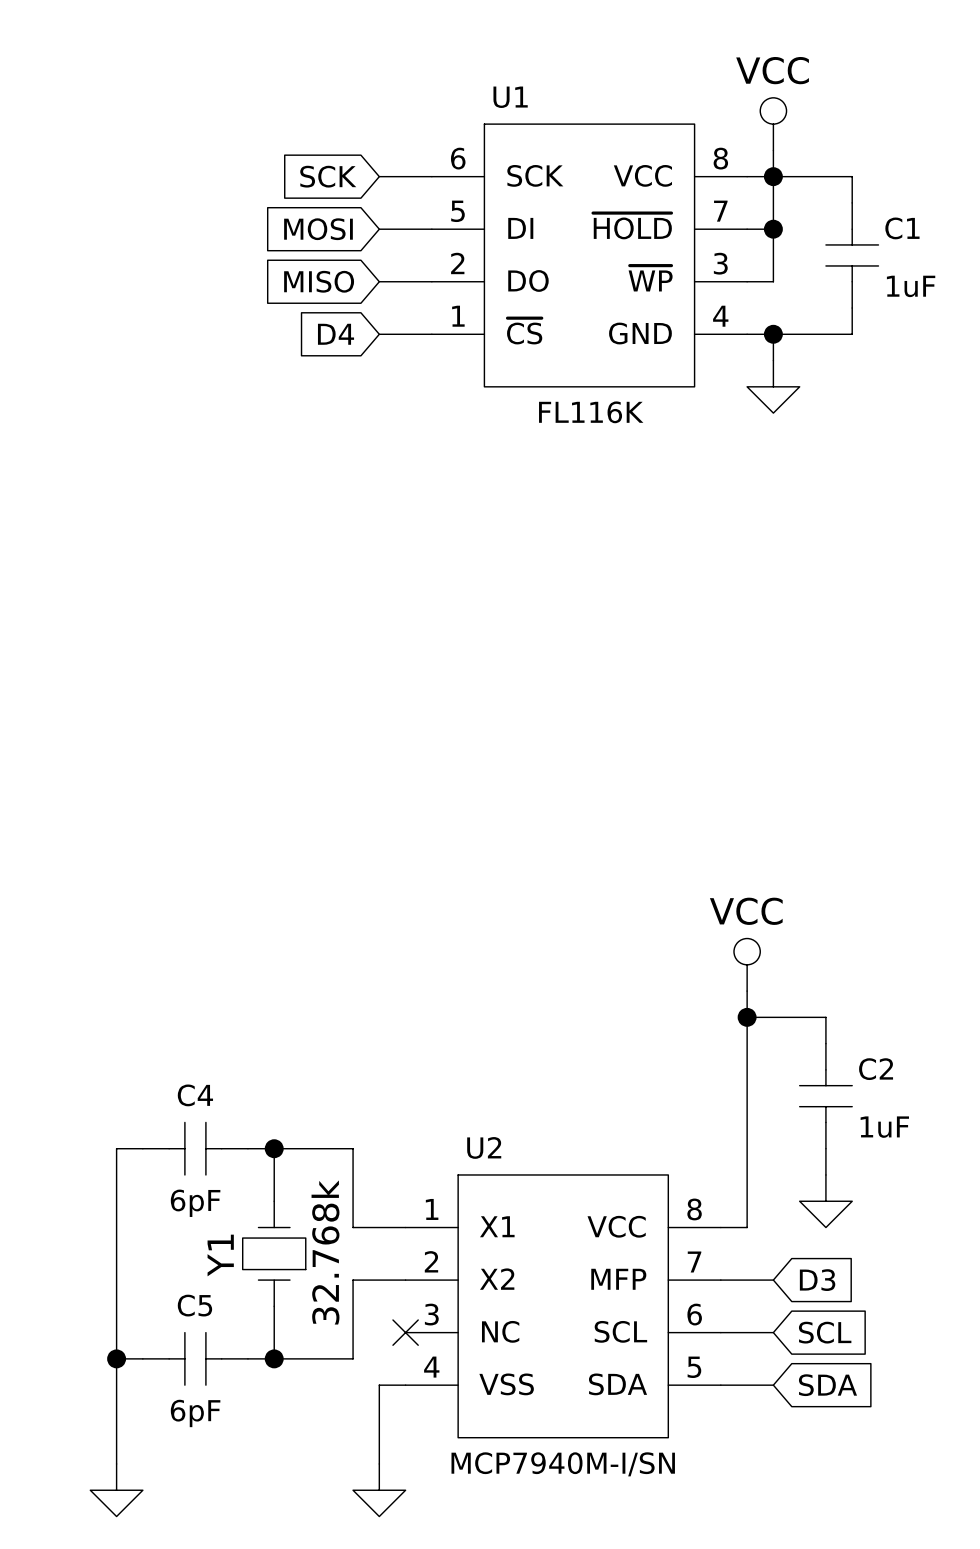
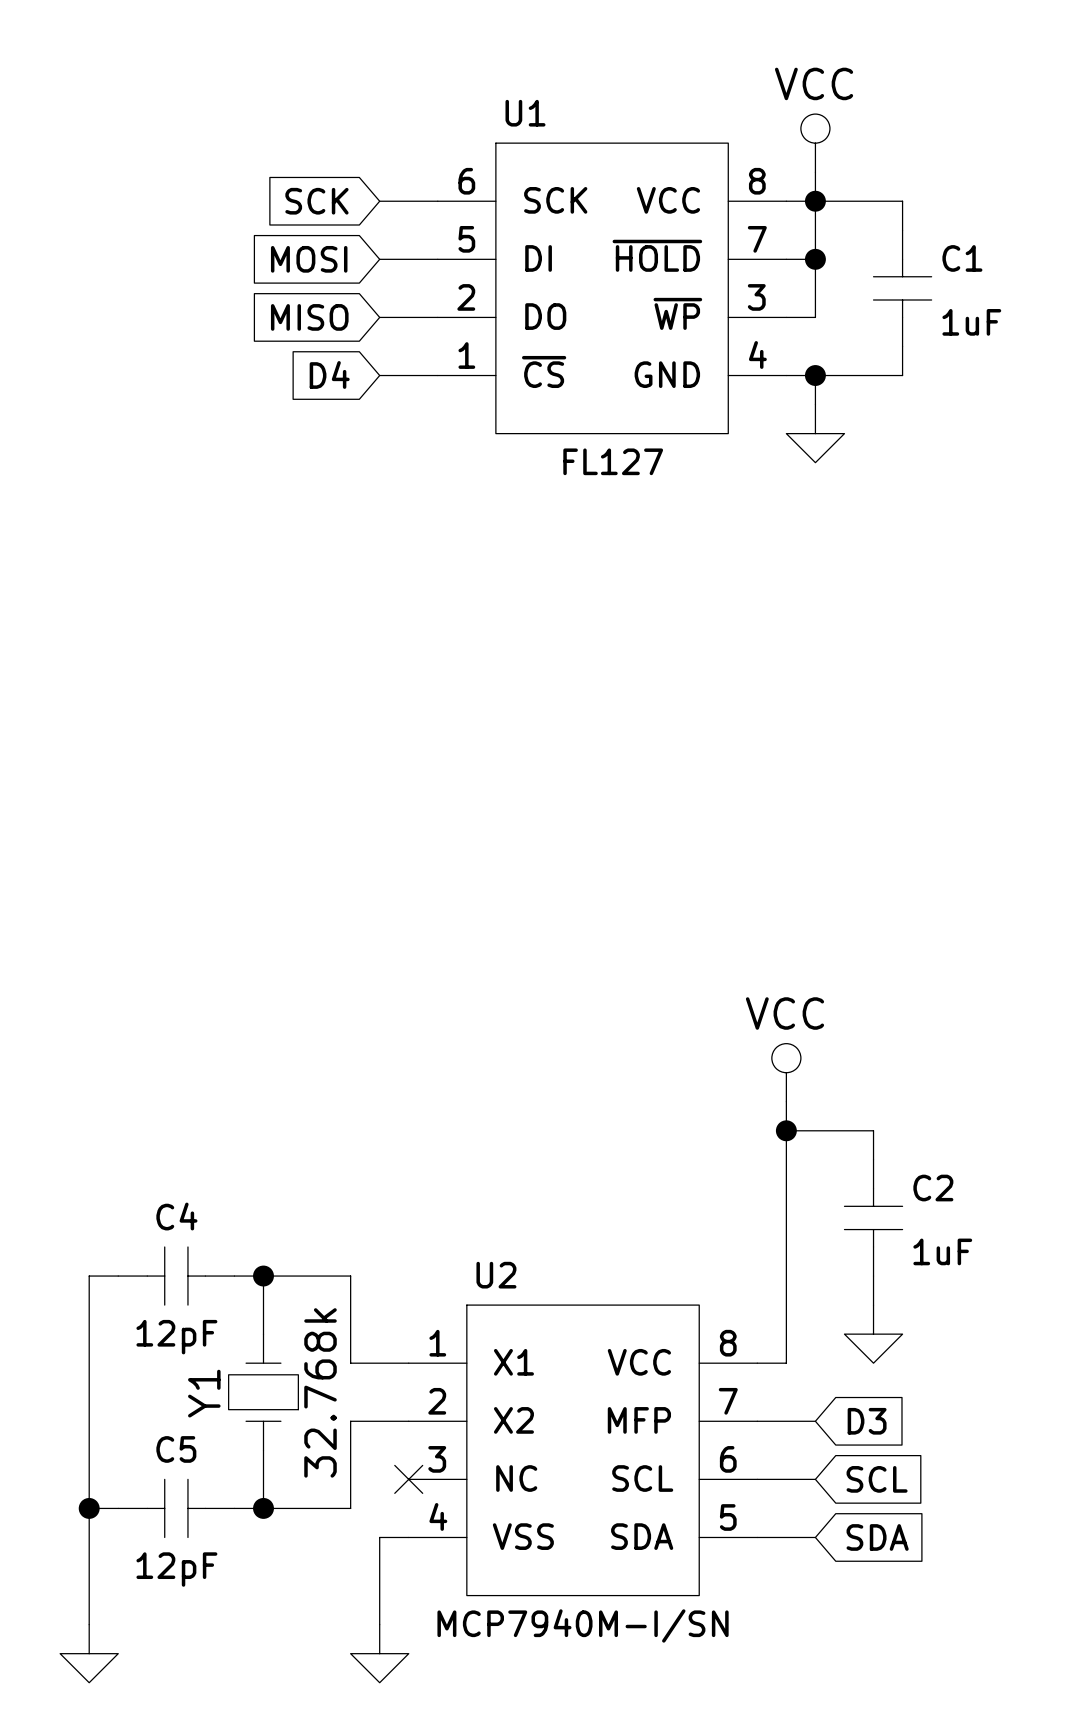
U1 value: FL116K (591, 412) -> FL127 (613, 461)
C4 value: 6pF (195, 1203) -> 12pF (176, 1337)
C5 value: 6pF (195, 1413) -> 12pF (176, 1569)

